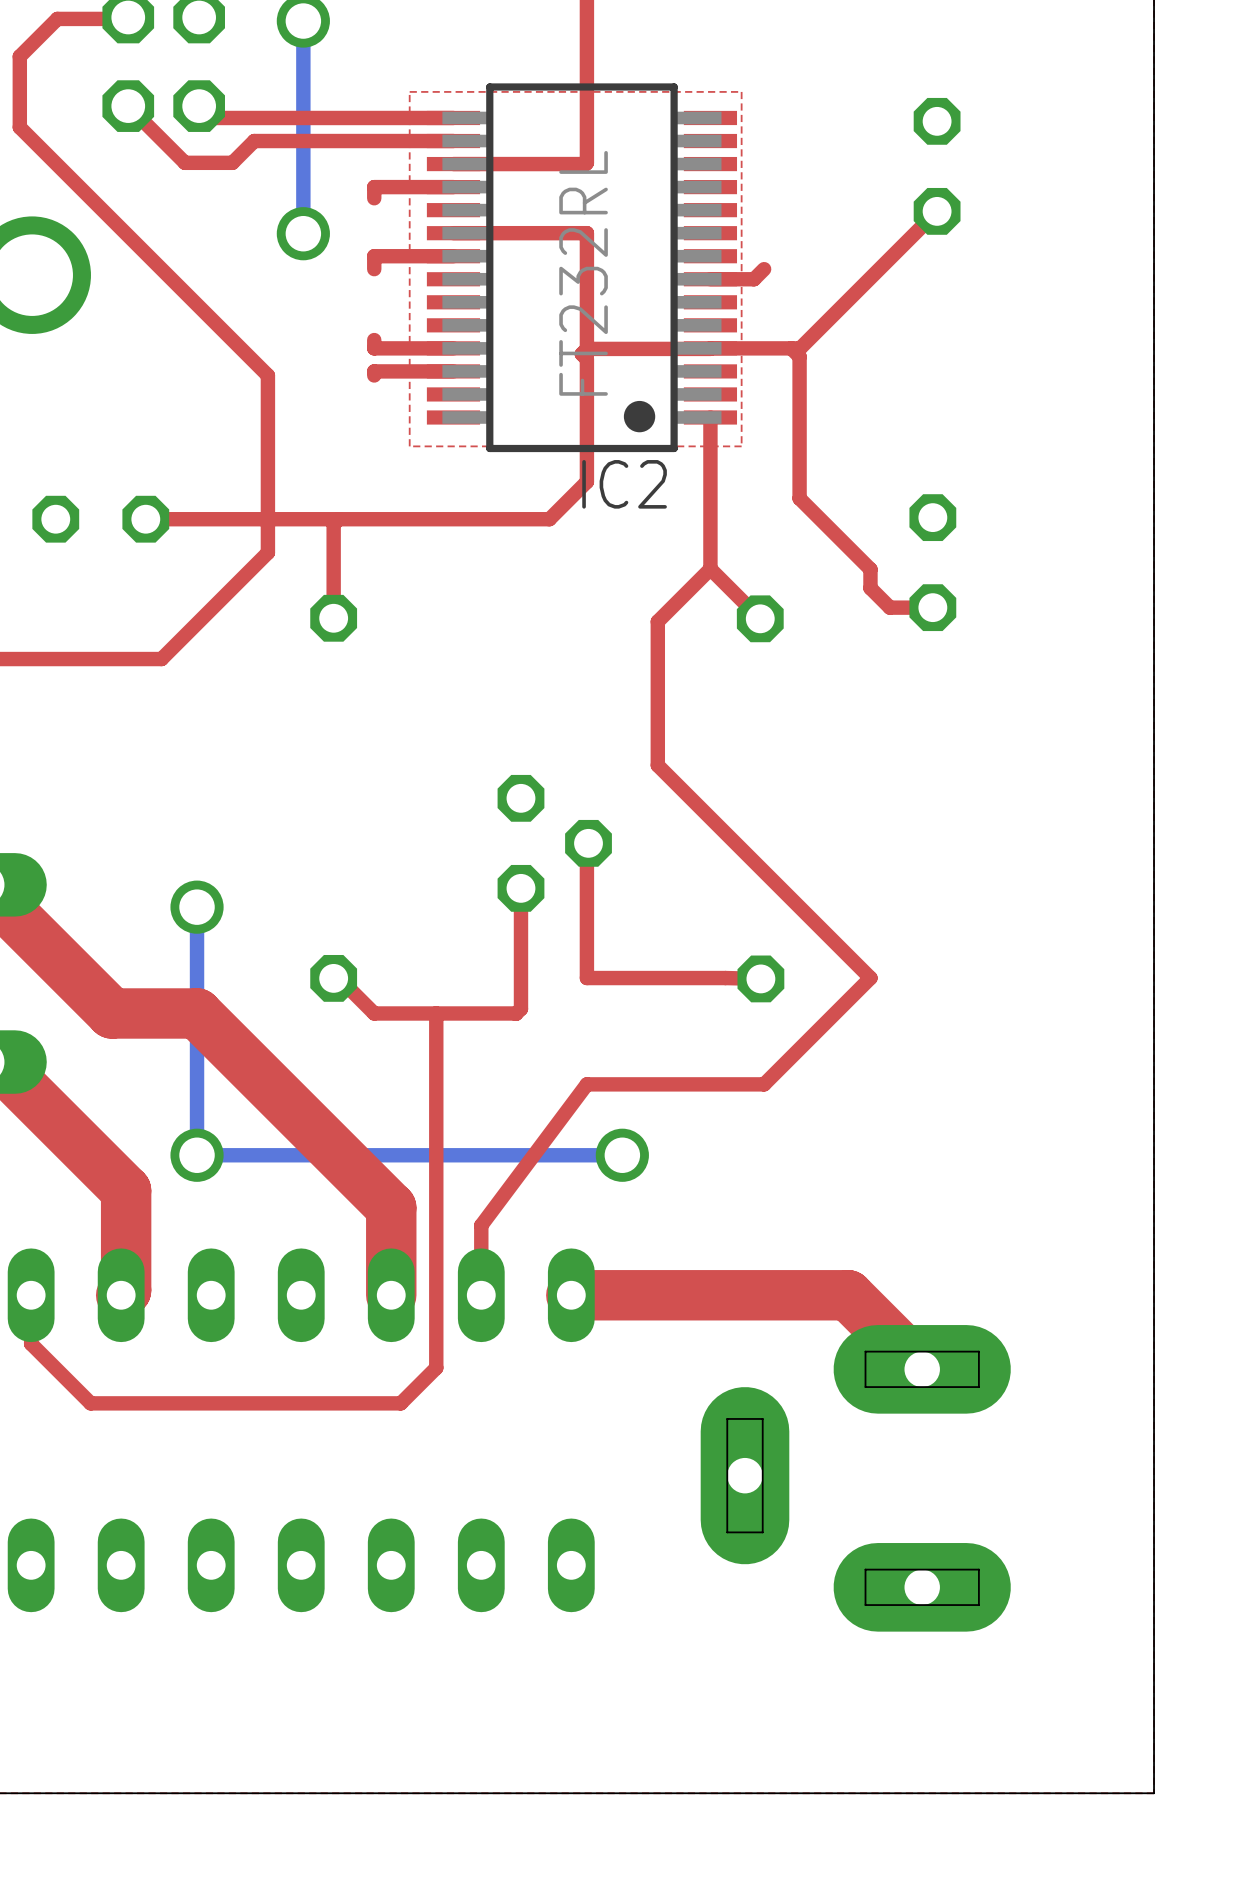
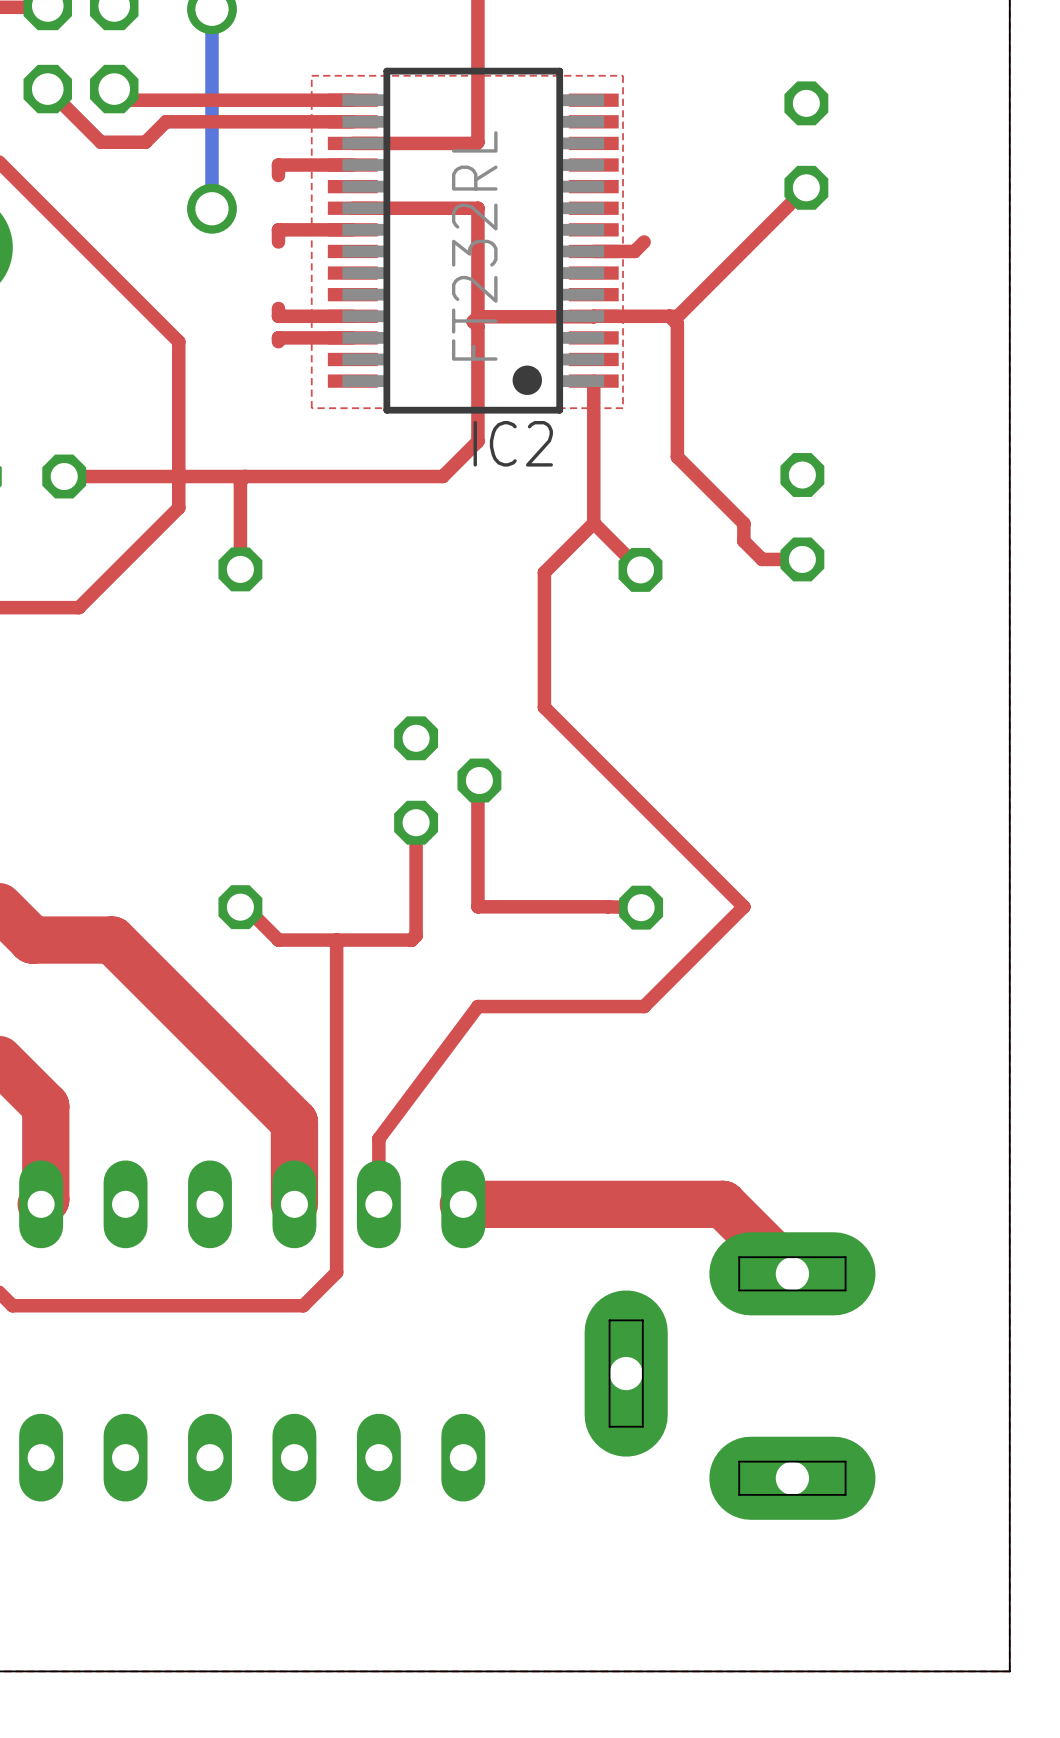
bottom track: (197, 907) (197, 1155) (622, 1155) -> none
via: (197, 907) -> none
via: (197, 1155) -> none
via: (622, 1155) -> none

